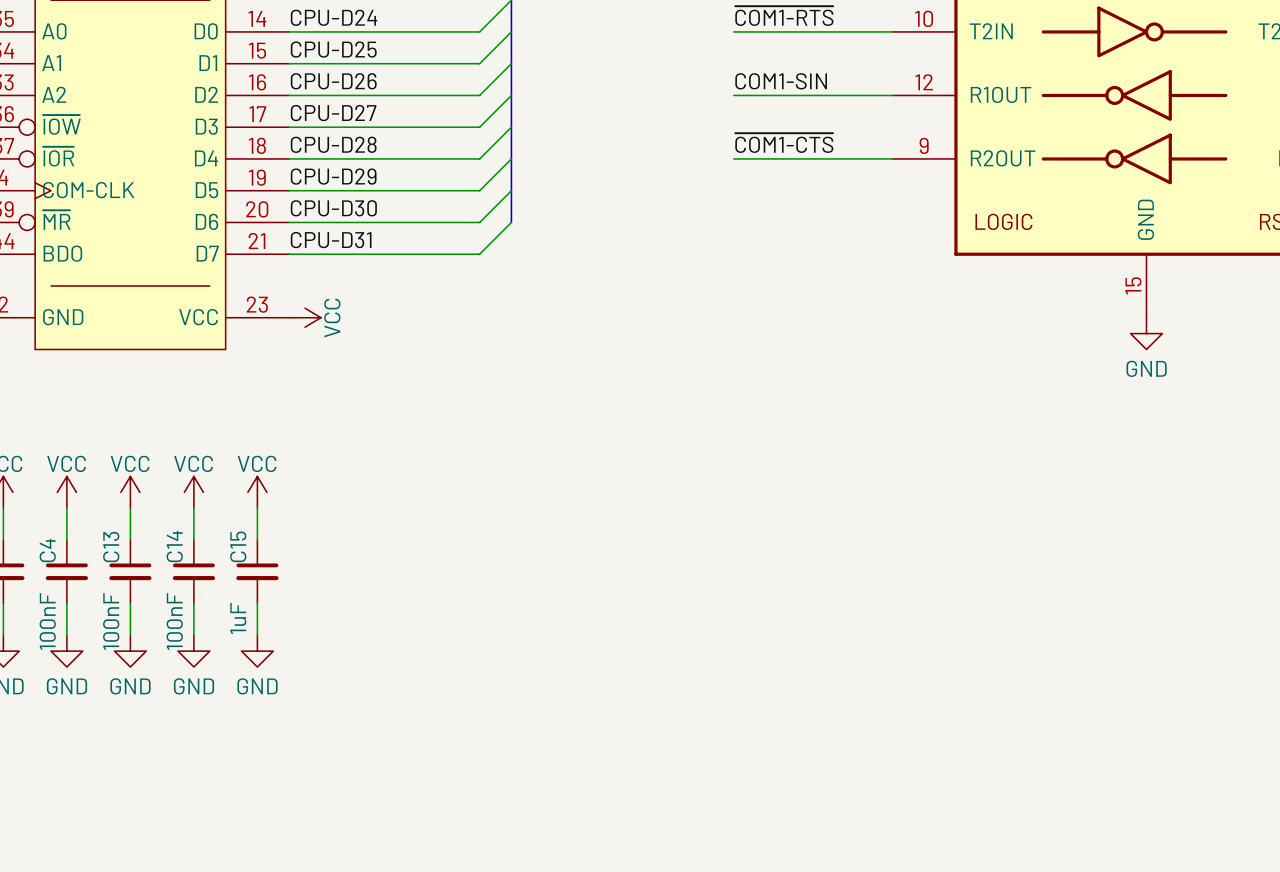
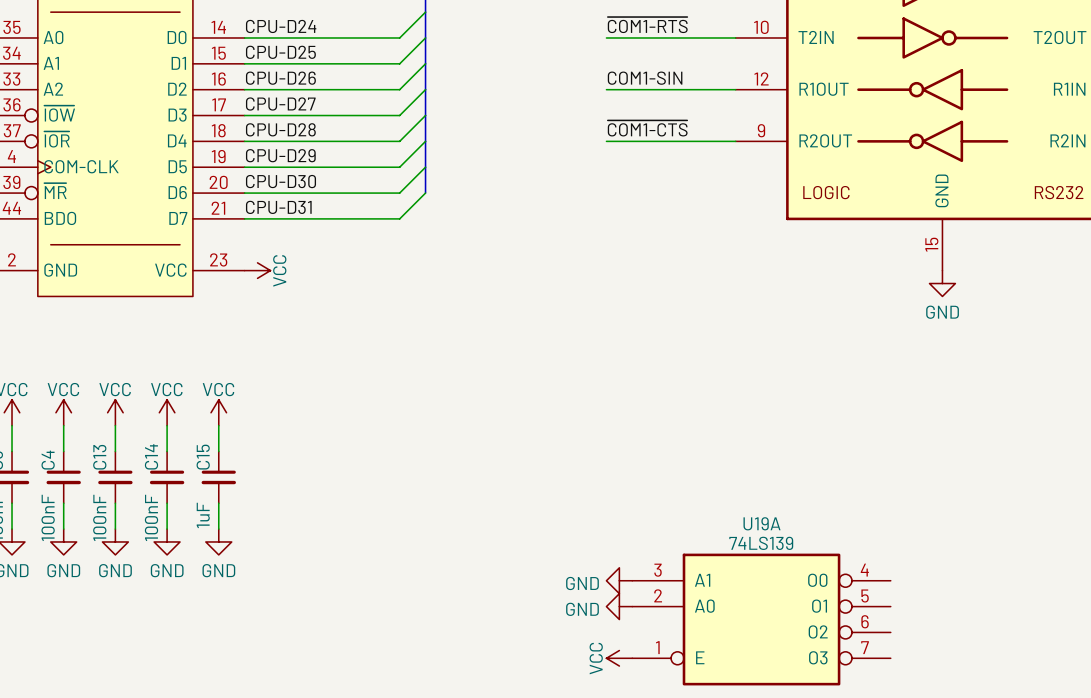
power symbol: none -> GND (619, 580)
power symbol: none -> GND (619, 606)
U19A: none -> 74LS139 (761, 619)
power symbol: none -> VCC (619, 658)

